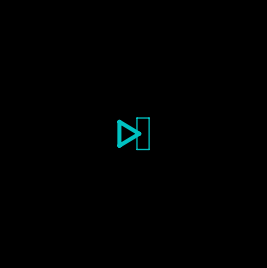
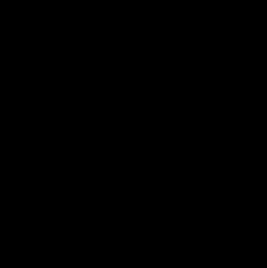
part: (133, 133) -> none

